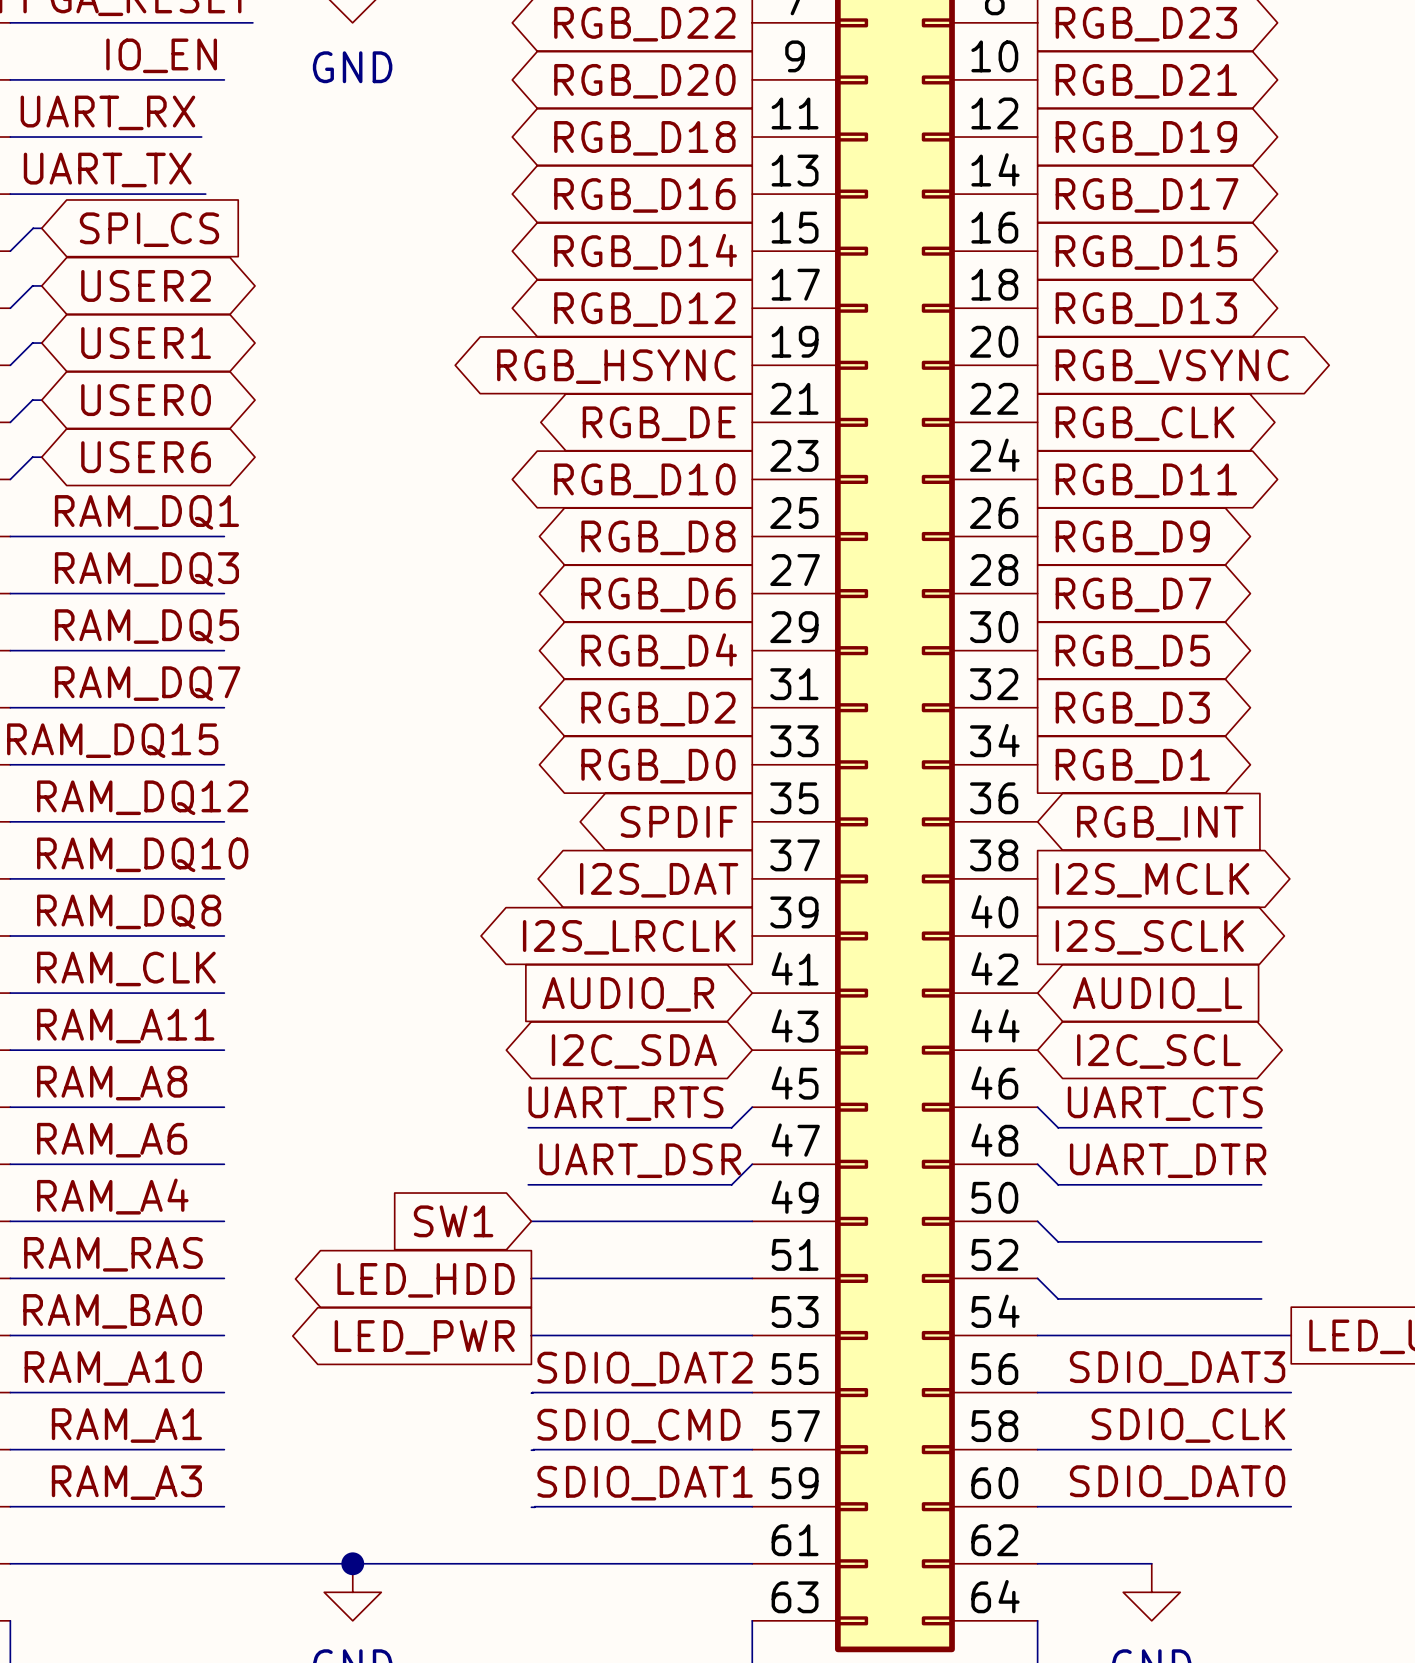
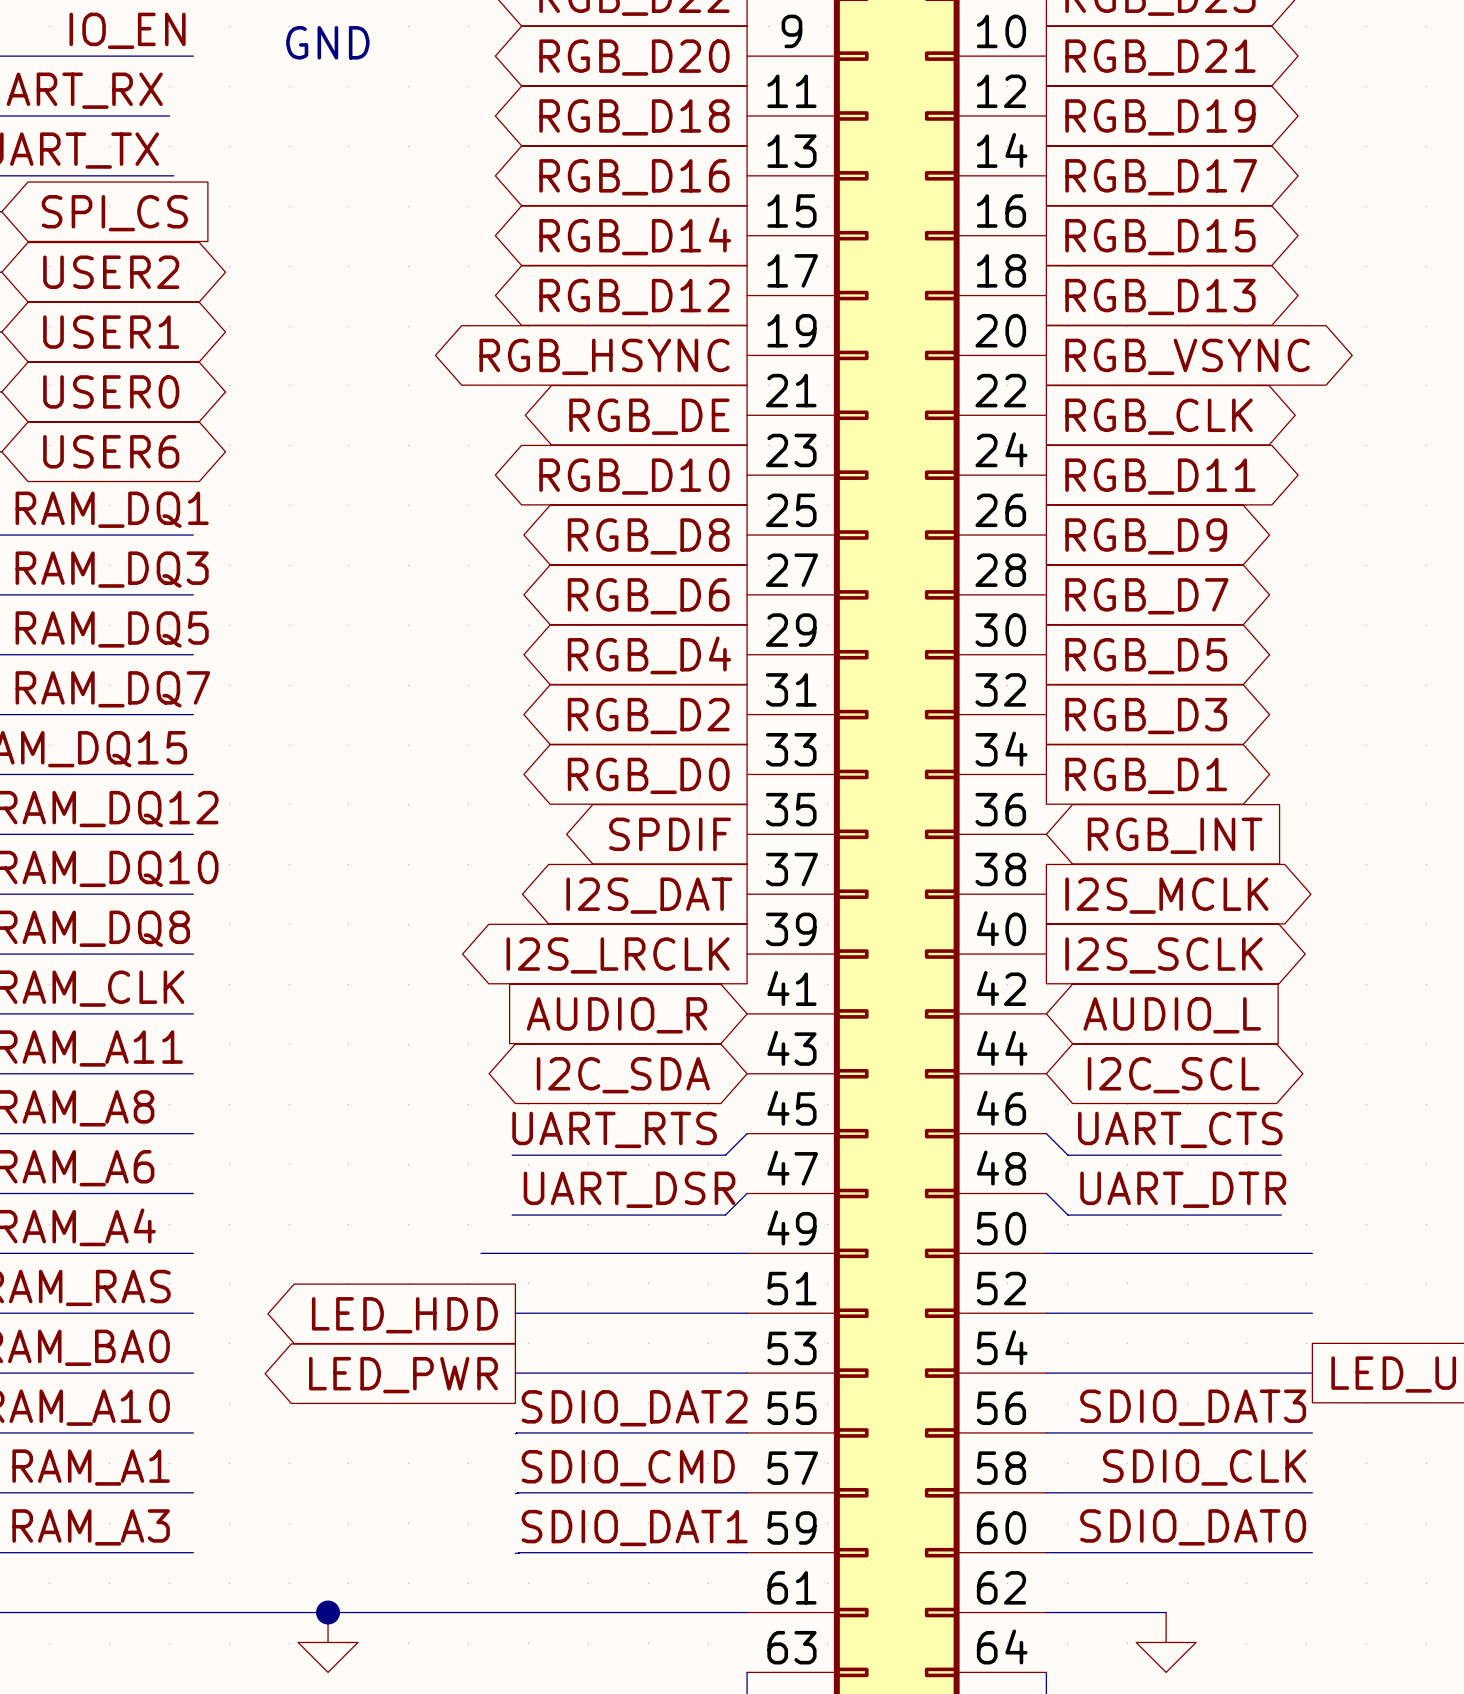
global label: SW1 (453, 1221) -> none
wire: none -> (481, 1253) (515, 1253)
wire: (1037, 1221) (1058, 1241) (1261, 1241) -> (1046, 1253) (1312, 1253)
wire: (1037, 1278) (1058, 1298) (1261, 1298) -> (1046, 1313) (1312, 1313)

